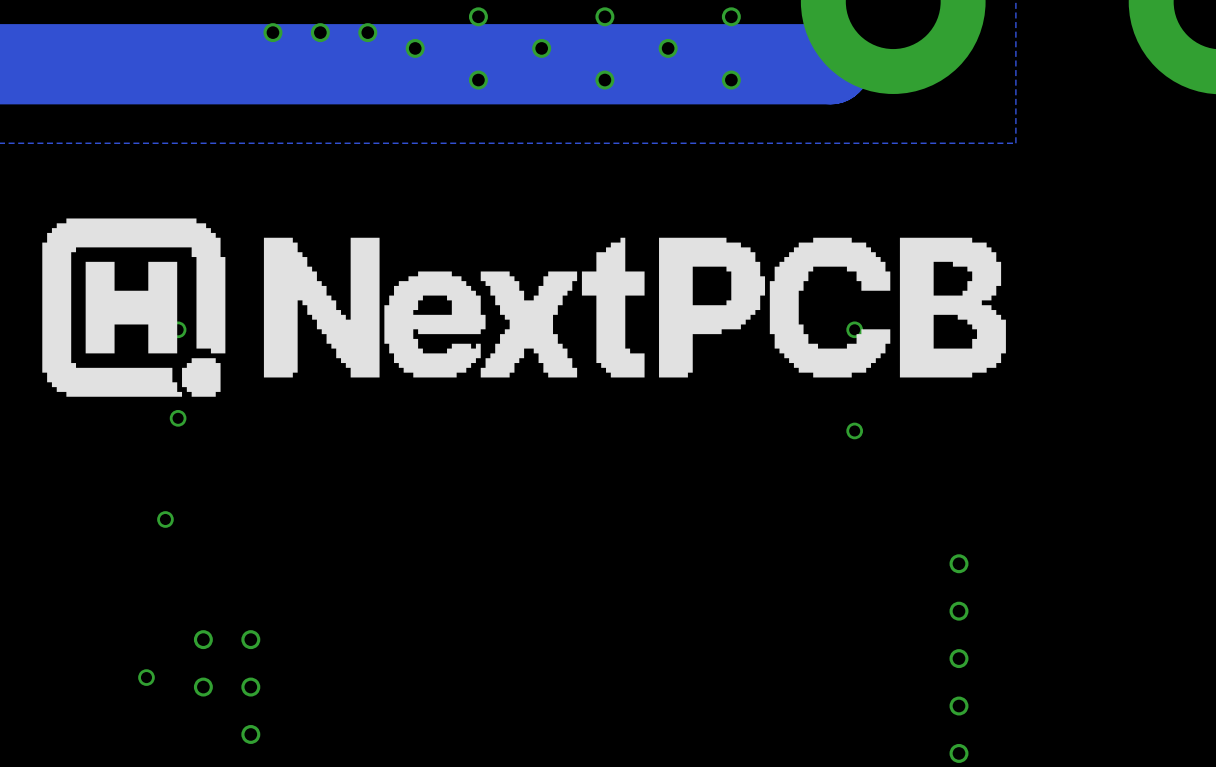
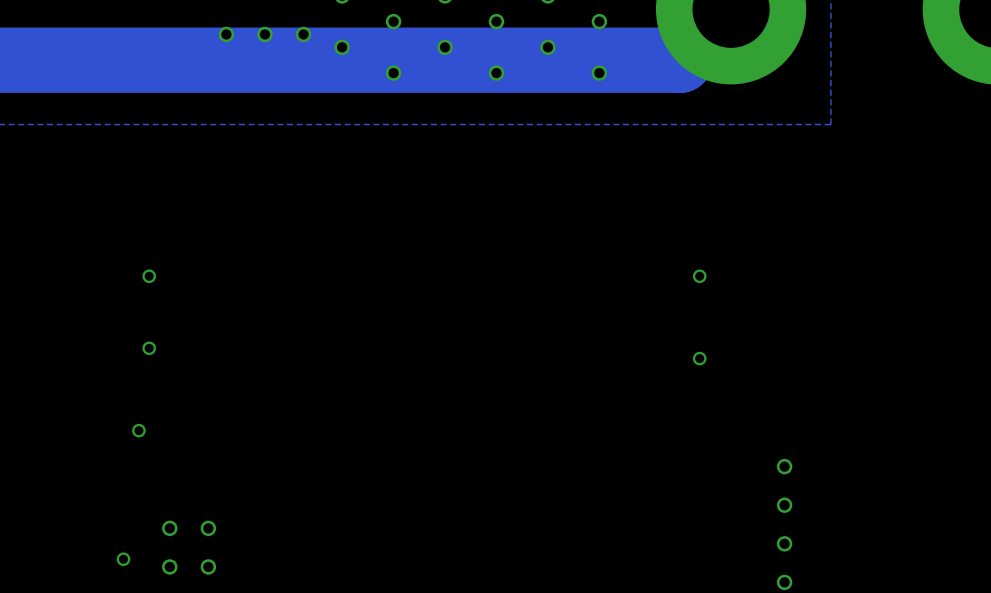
drawing: [42, 218, 1006, 397] -> none

